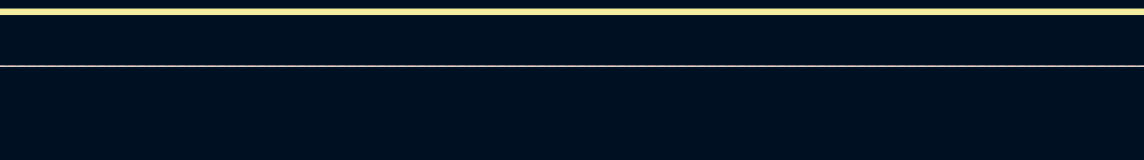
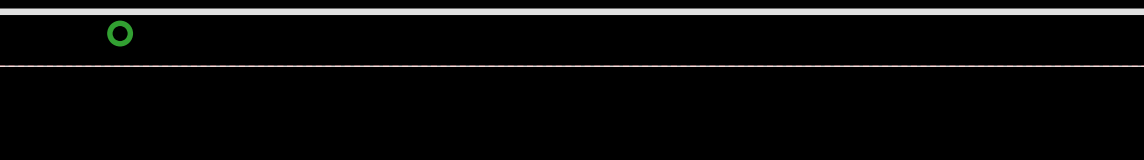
via: none -> (120, 33)

